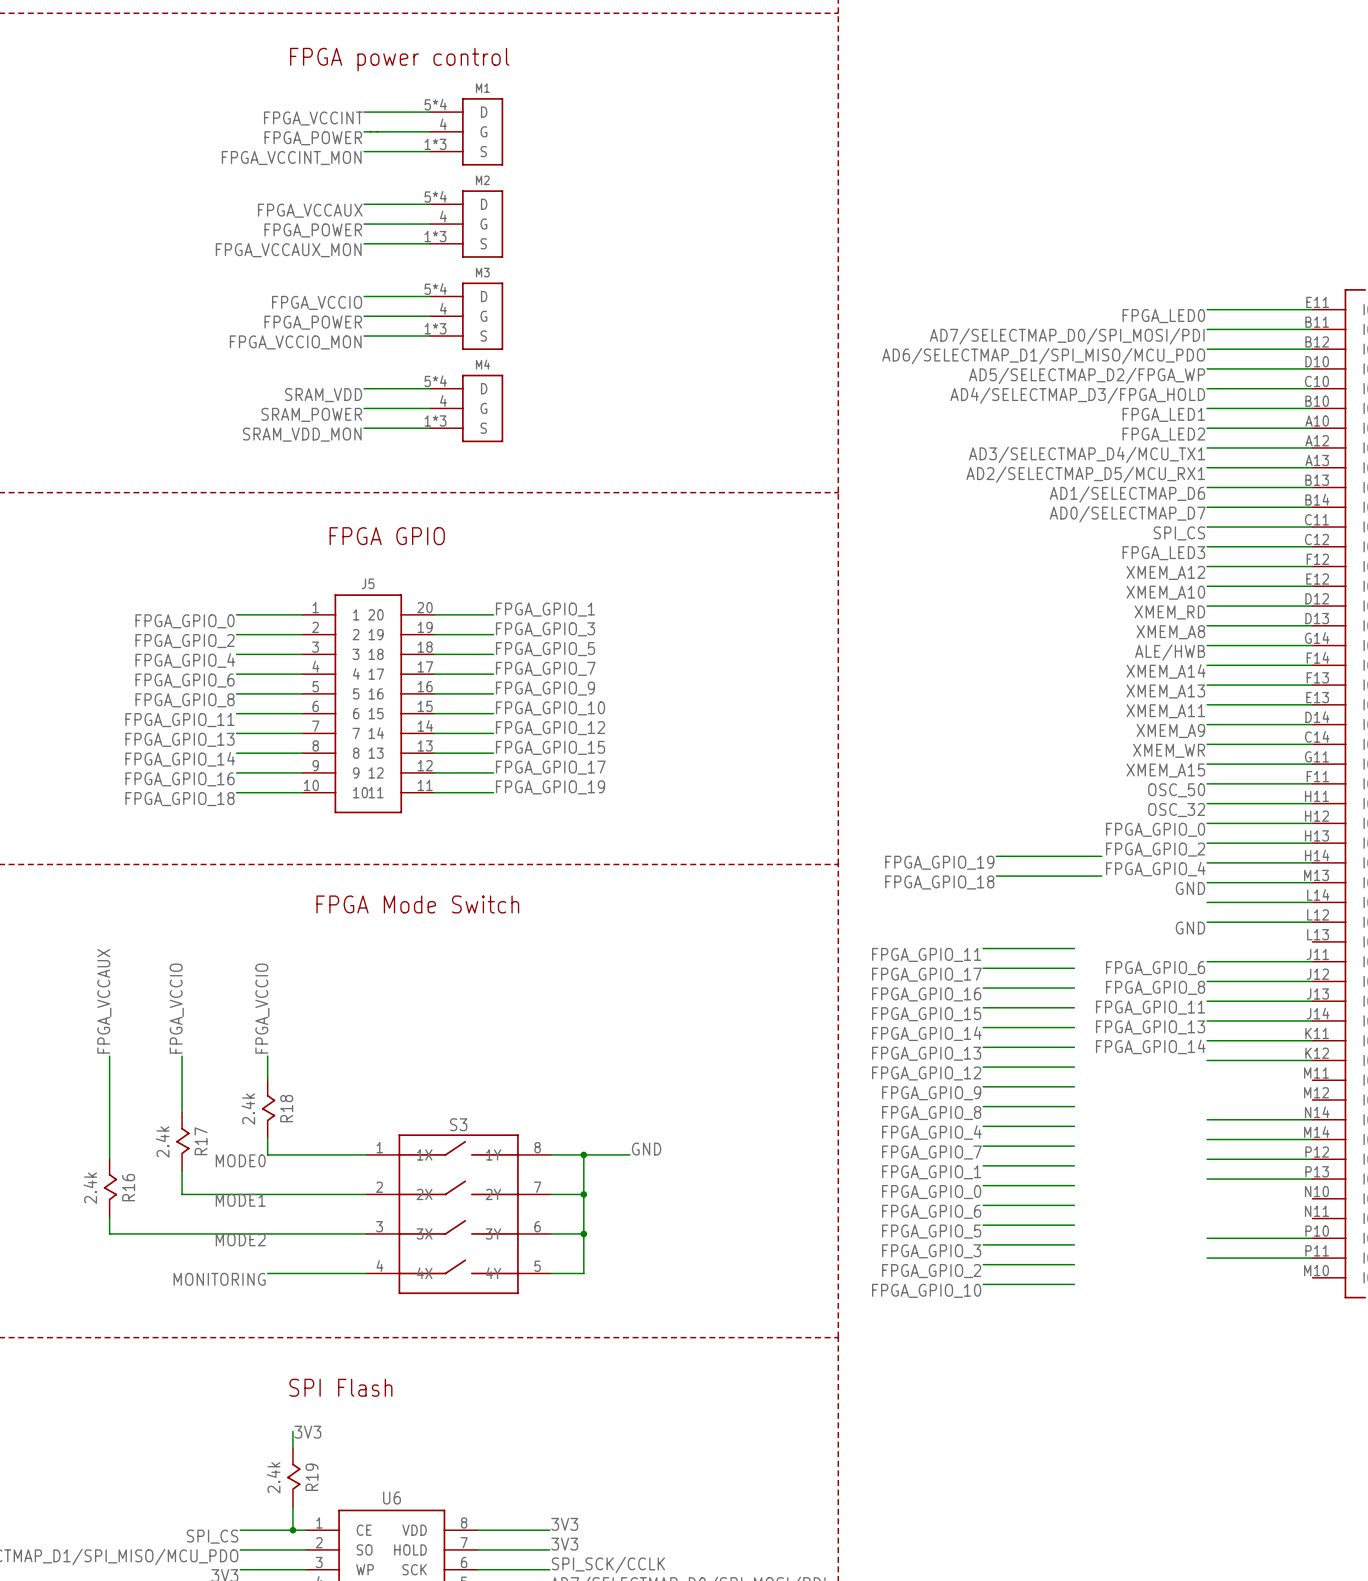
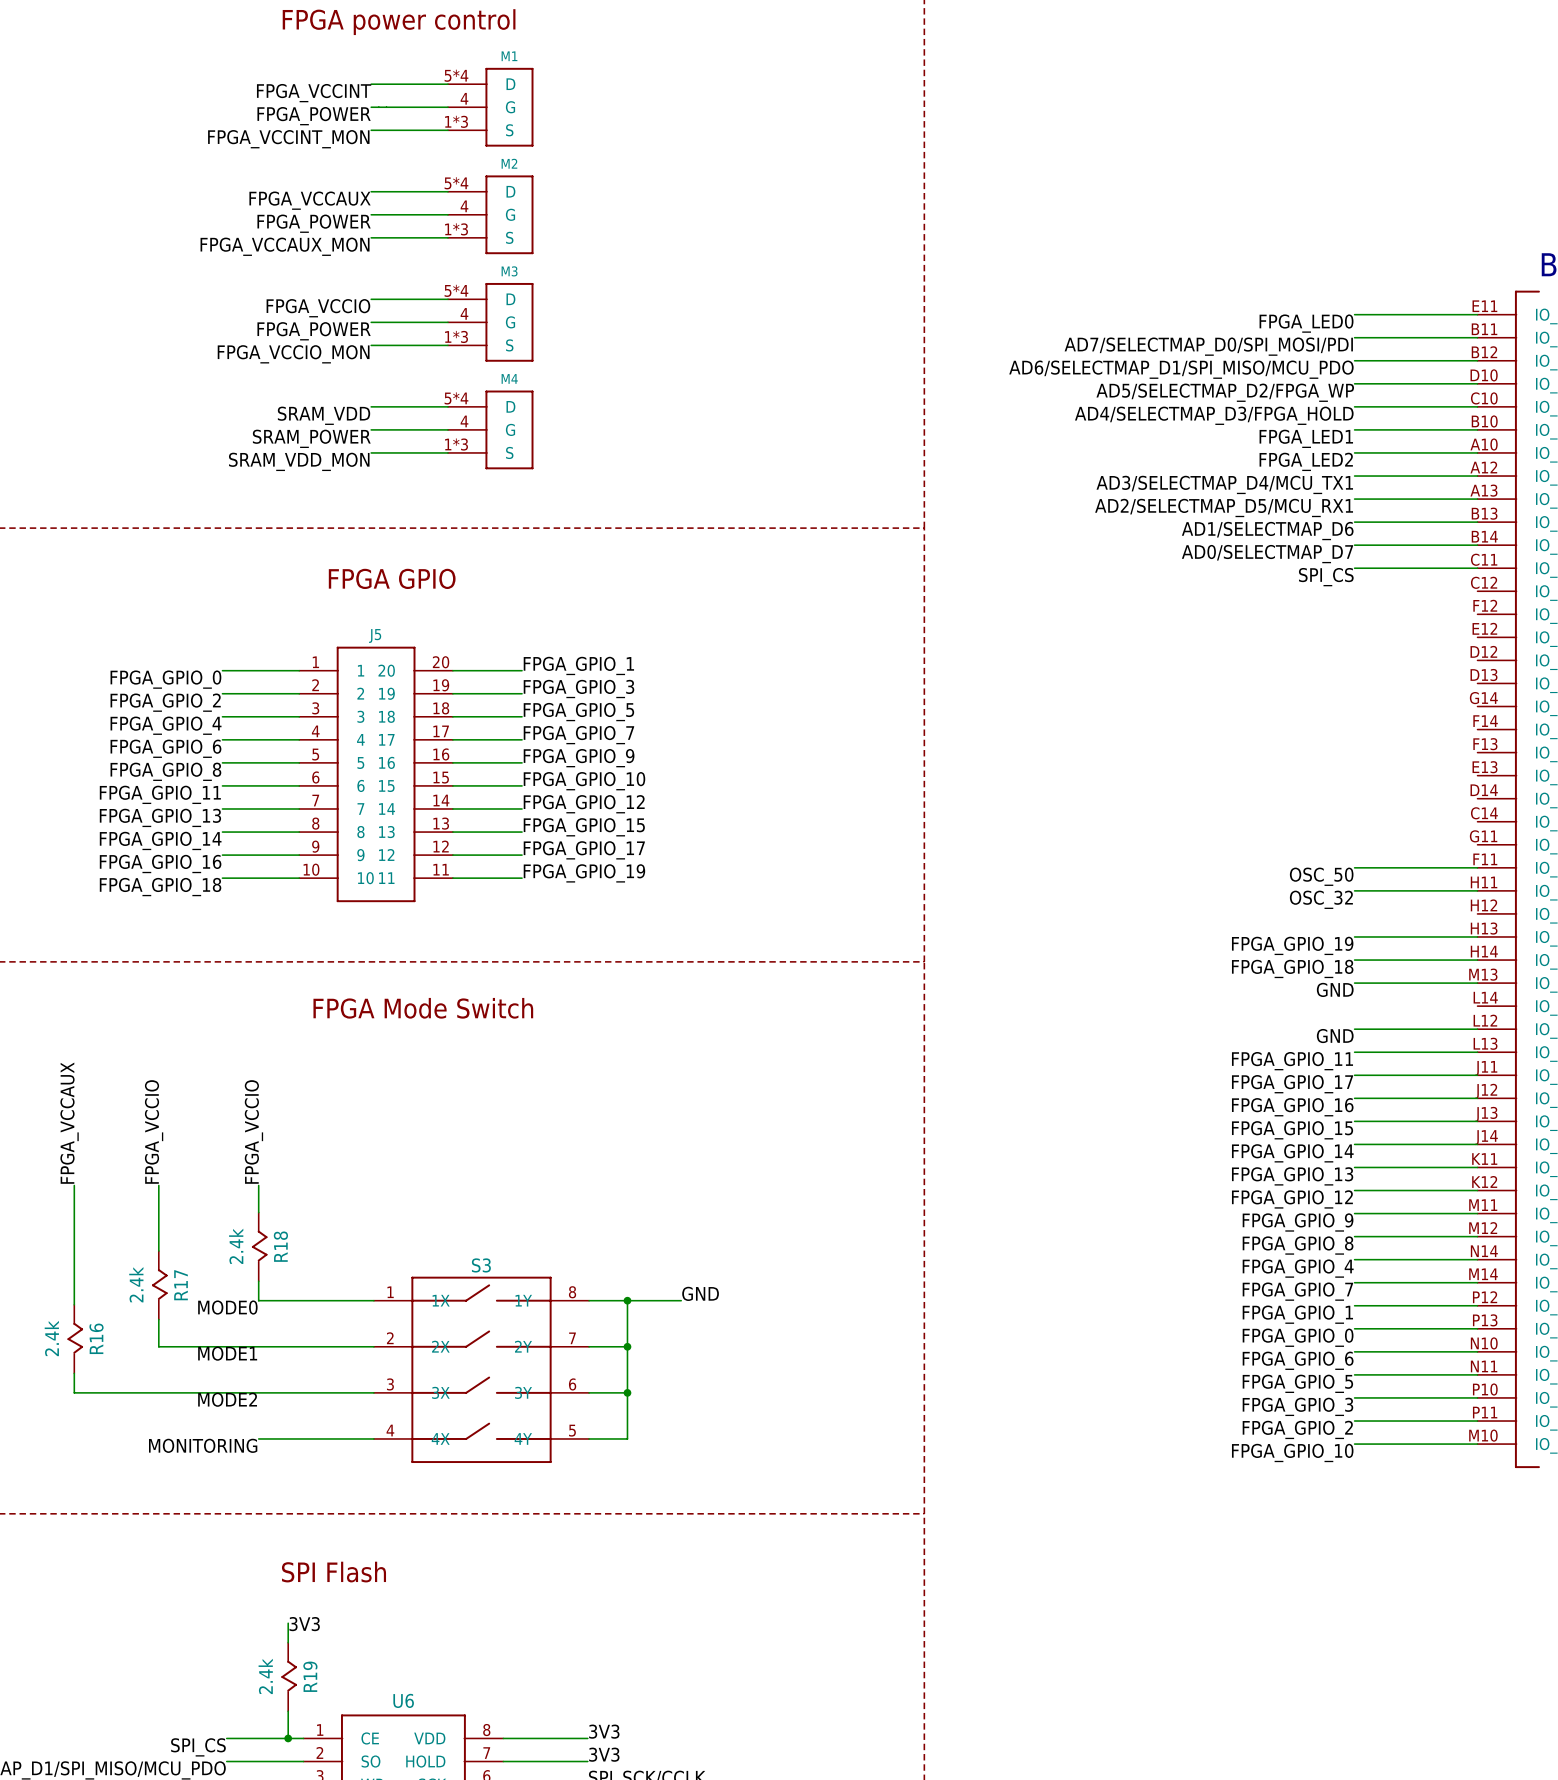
wire: (1207, 546) (1312, 546) -> none
label: FPGA_LED3 (1163, 553) -> none
wire: (1207, 566) (1312, 566) -> none
label: XMEM_A12 (1165, 572) -> none
wire: (1207, 586) (1312, 586) -> none
label: XMEM_A10 (1165, 592) -> none
wire: (1207, 606) (1312, 606) -> none
label: XMEM_RD (1169, 612) -> none
wire: (1207, 625) (1312, 625) -> none
label: XMEM_A8 (1170, 632) -> none
wire: (1207, 645) (1312, 645) -> none
label: ALE/HWB (1170, 652) -> none
wire: (1207, 665) (1312, 665) -> none
label: XMEM_A14 (1166, 671) -> none
wire: (1207, 685) (1312, 685) -> none
label: XMEM_A13 (1165, 691) -> none
wire: (1207, 704) (1312, 704) -> none
label: XMEM_A11 (1165, 711) -> none
wire: (1207, 724) (1312, 724) -> none
label: XMEM_A9 (1170, 731) -> none
wire: (1207, 744) (1312, 744) -> none
label: XMEM_WR (1169, 750) -> none
wire: (1207, 764) (1312, 764) -> none
label: XMEM_A15 (1165, 770) -> none
wire: (1207, 823) (1312, 823) -> none
label: FPGA_GPIO_0 (1155, 829) -> none
label: FPGA_GPIO_2 (1155, 849) -> FPGA_GPIO_19 (1292, 945)
wire: (996, 856) (1101, 856) -> none
label: FPGA_GPIO_19 (939, 862) -> none
label: FPGA_GPIO_4 (1155, 869) -> FPGA_GPIO_18 (1292, 968)
wire: (996, 876) (1101, 876) -> none
label: FPGA_GPIO_18 (939, 882) -> none
wire: (1207, 902) (1312, 902) -> (1354, 1052) (1477, 1052)
wire: (983, 948) (1074, 948) -> none
label: none -> FPGA_GPIO_11 (1292, 1061)
label: FPGA_GPIO_11 (926, 954) -> none
wire: (983, 968) (1074, 968) -> none
label: FPGA_GPIO_6 (1155, 968) -> FPGA_GPIO_17 (1292, 1084)
label: FPGA_GPIO_17 (926, 974) -> none
label: FPGA_GPIO_8 (1155, 987) -> FPGA_GPIO_16 (1292, 1107)
wire: (983, 988) (1074, 988) -> none
label: FPGA_GPIO_16 (926, 994) -> none
wire: (983, 1007) (1074, 1007) -> none
label: FPGA_GPIO_11 (1150, 1007) -> FPGA_GPIO_15 (1292, 1130)
label: FPGA_GPIO_15 (926, 1014) -> none
wire: (983, 1027) (1074, 1027) -> none
label: FPGA_GPIO_13 (1150, 1027) -> FPGA_GPIO_14 (1292, 1153)
label: FPGA_GPIO_14 (926, 1033) -> none
label: FPGA_GPIO_14 (1150, 1046) -> FPGA_GPIO_13 (1292, 1176)
wire: (983, 1047) (1074, 1047) -> none
label: FPGA_GPIO_13 (926, 1053) -> none
label: none -> FPGA_GPIO_12 (1292, 1199)
wire: (983, 1067) (1074, 1067) -> none
label: FPGA_GPIO_12 (926, 1073) -> none
wire: none -> (1354, 1213) (1477, 1213)
wire: (983, 1086) (1074, 1086) -> none
label: none -> FPGA_GPIO_9 (1298, 1222)
label: FPGA_GPIO_9 (931, 1093) -> none
wire: none -> (1354, 1236) (1477, 1236)
wire: (983, 1106) (1074, 1106) -> none
label: none -> FPGA_GPIO_8 (1298, 1245)
label: FPGA_GPIO_8 (931, 1113) -> none
label: none -> FPGA_GPIO_4 (1298, 1268)
wire: (983, 1126) (1074, 1126) -> none
label: FPGA_GPIO_4 (931, 1132) -> none
label: none -> FPGA_GPIO_7 (1297, 1291)
wire: (983, 1146) (1074, 1146) -> none
label: FPGA_GPIO_7 (931, 1152) -> none
wire: (983, 1165) (1074, 1165) -> none
label: none -> FPGA_GPIO_1 (1297, 1314)
label: FPGA_GPIO_1 (931, 1172) -> none
wire: (983, 1185) (1074, 1185) -> none
label: none -> FPGA_GPIO_0 (1298, 1337)
label: FPGA_GPIO_0 (931, 1192) -> none
wire: none -> (1354, 1351) (1477, 1351)
wire: (983, 1205) (1074, 1205) -> none
label: none -> FPGA_GPIO_6 (1298, 1360)
label: FPGA_GPIO_6 (931, 1211) -> none
wire: none -> (1354, 1374) (1477, 1374)
label: none -> FPGA_GPIO_5 (1297, 1383)
wire: (983, 1225) (1074, 1225) -> none
label: FPGA_GPIO_5 (931, 1231) -> none
wire: (983, 1244) (1074, 1244) -> none
label: none -> FPGA_GPIO_3 (1297, 1406)
label: FPGA_GPIO_3 (931, 1251) -> none
wire: (983, 1264) (1074, 1264) -> none
label: none -> FPGA_GPIO_2 (1297, 1429)
label: FPGA_GPIO_2 (931, 1271) -> none
wire: none -> (1354, 1444) (1477, 1444)
wire: (983, 1284) (1074, 1284) -> none
label: none -> FPGA_GPIO_10 (1292, 1452)
label: FPGA_GPIO_10 (926, 1290) -> none

